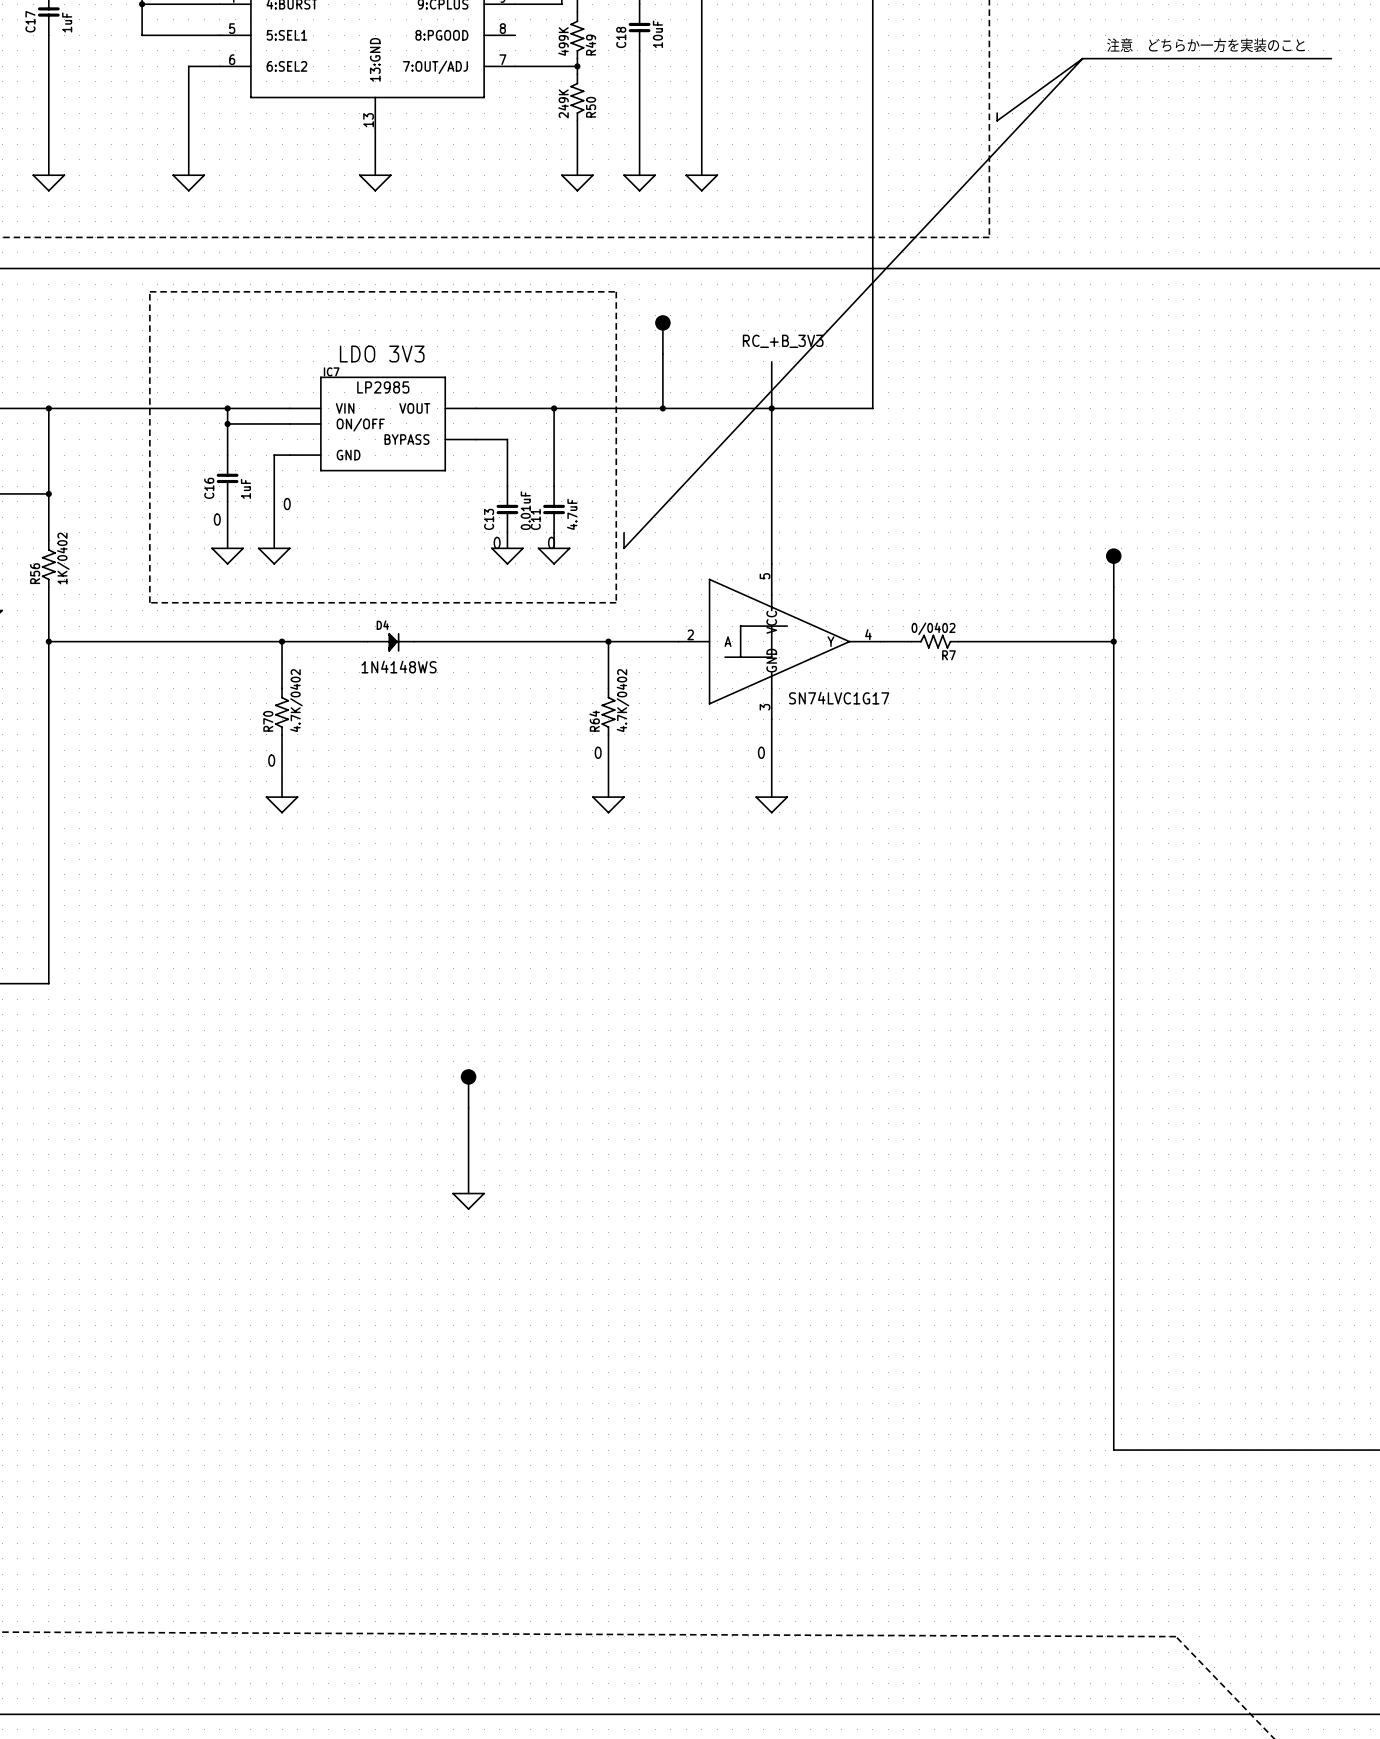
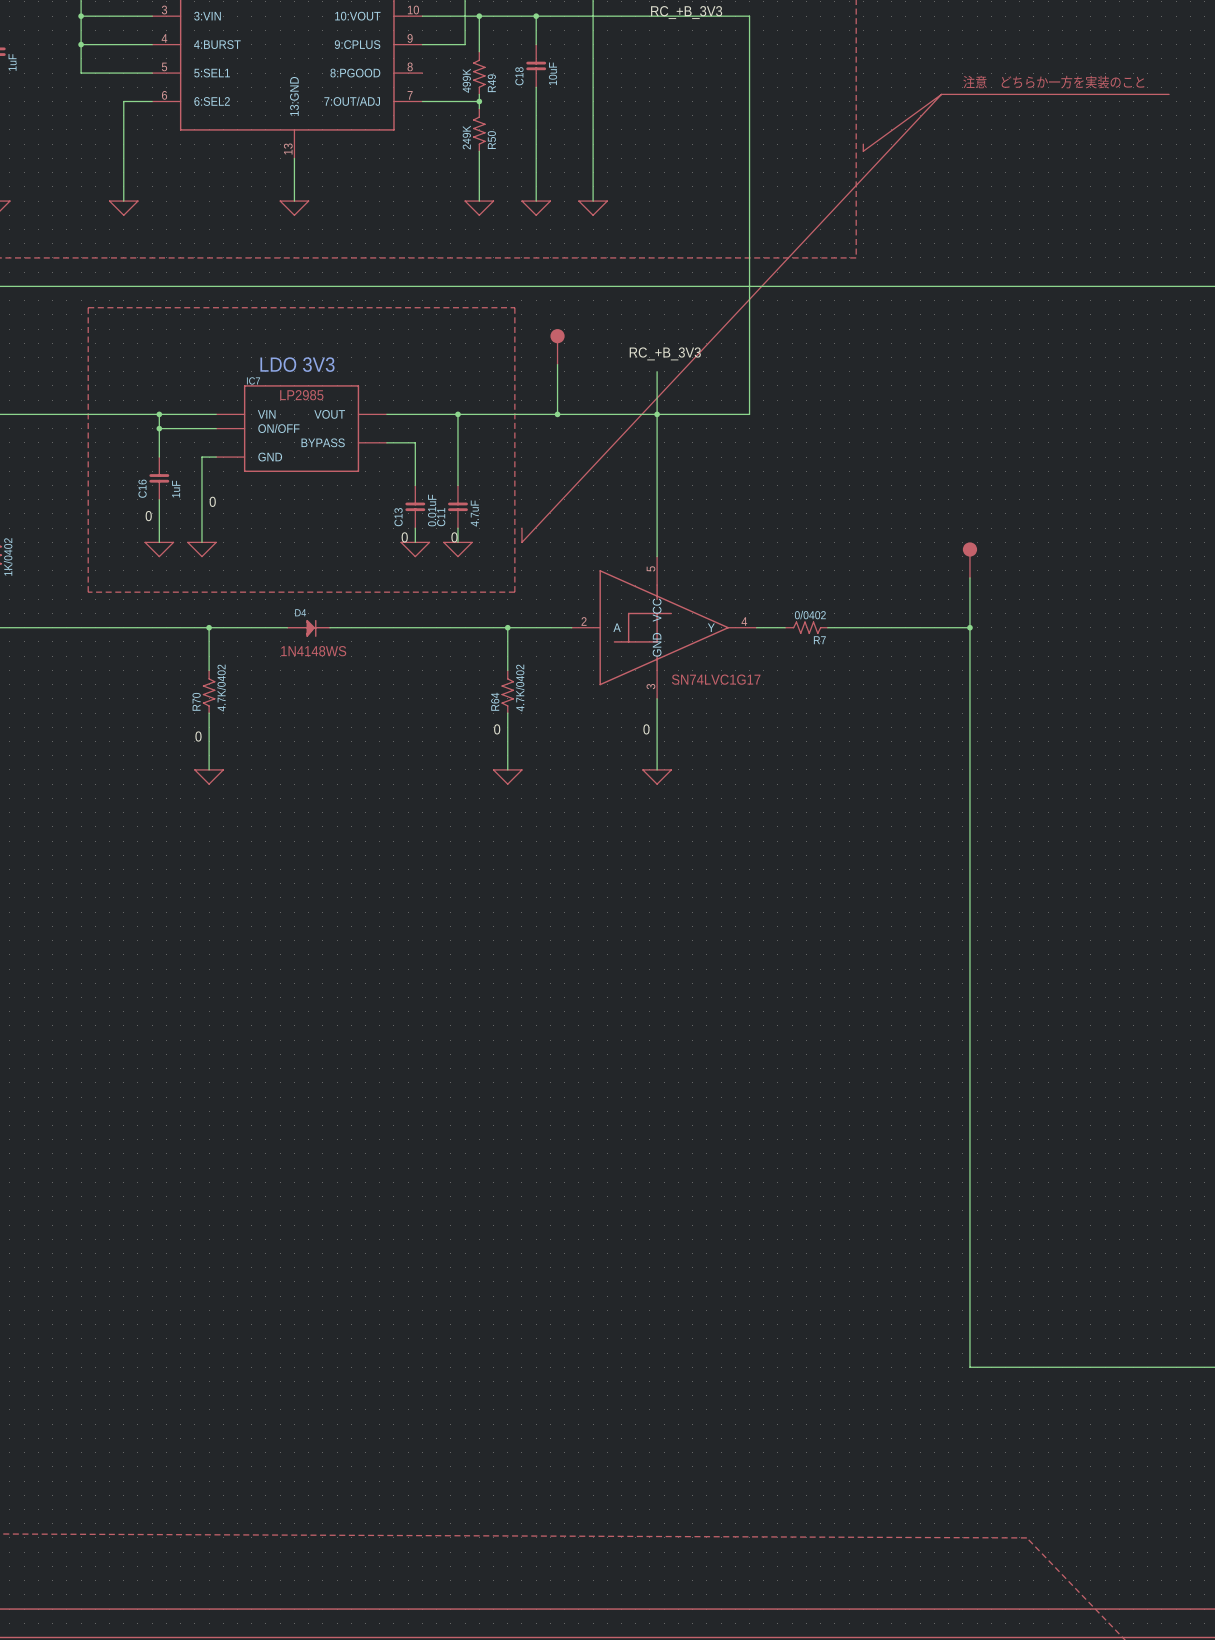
part: (468, 1088) -> none
wire: (468, 1108) (468, 1193) -> none
power symbol: (468, 1201) -> none

